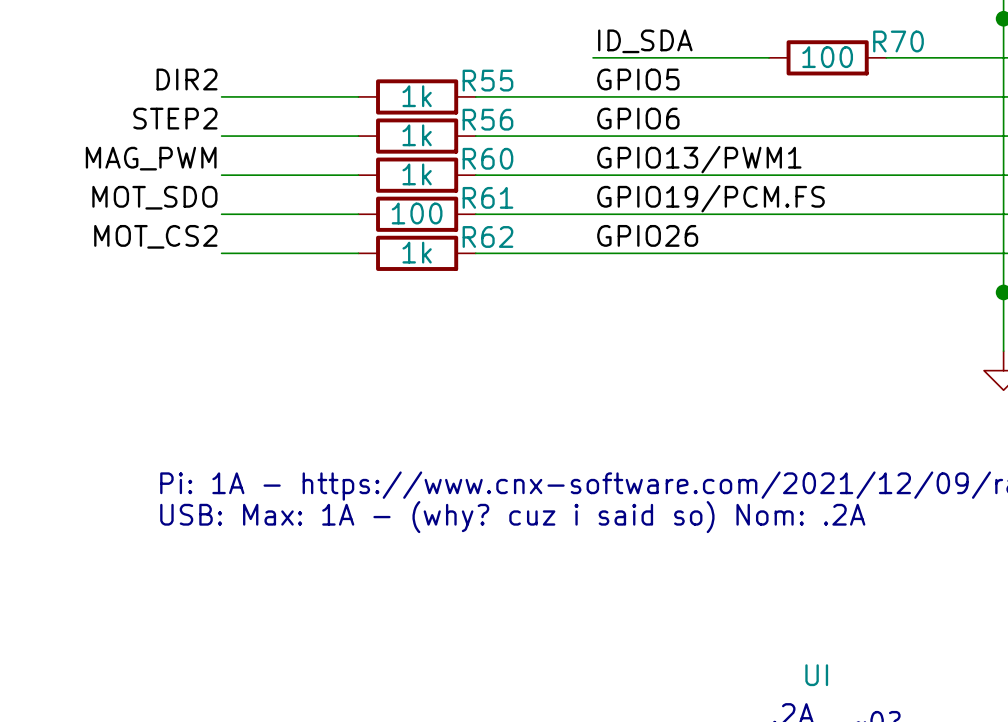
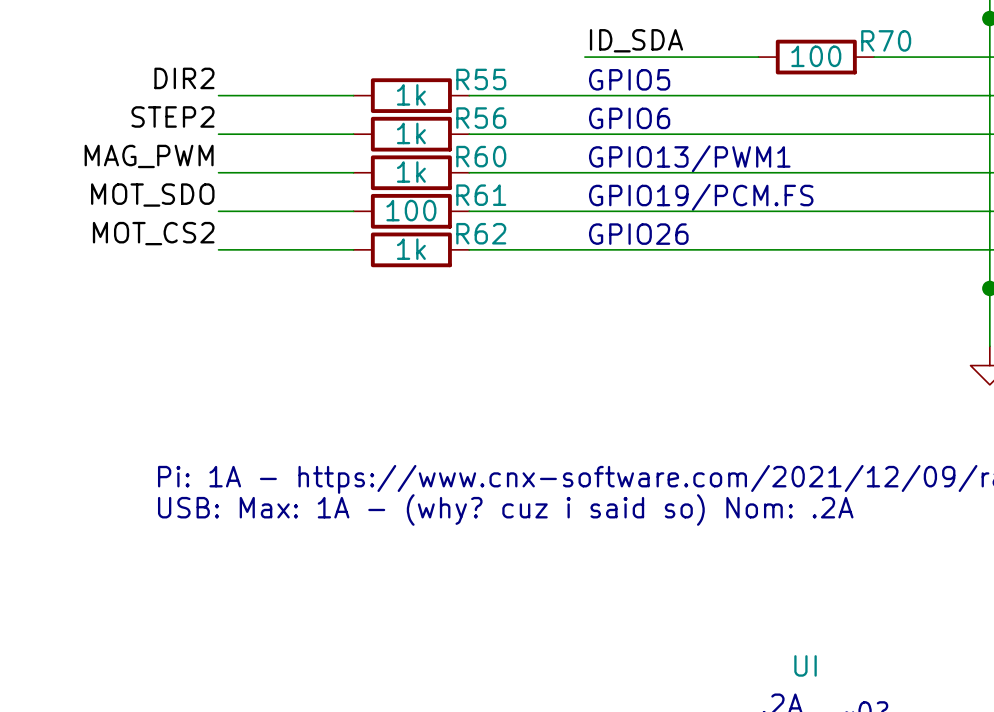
label: GPIO5 (638, 79) -> none
text: none -> GPIO5 (629, 79)
label: GPIO6 (638, 118) -> none
text: none -> GPIO6 (629, 118)
label: GPIO13/PWM1 (699, 159) -> none
text: none -> GPIO13/PWM1 (689, 158)
label: GPIO19/PCM.FS (710, 198) -> none
text: none -> GPIO19/PCM.FS (701, 197)
label: GPIO26 (647, 235) -> none
text: none -> GPIO26 (638, 234)

